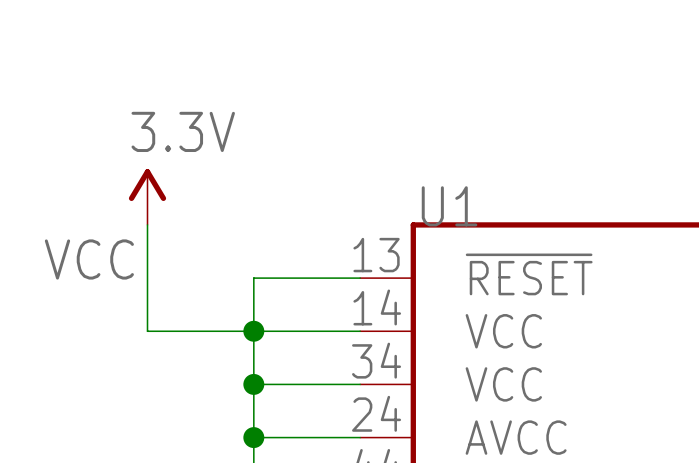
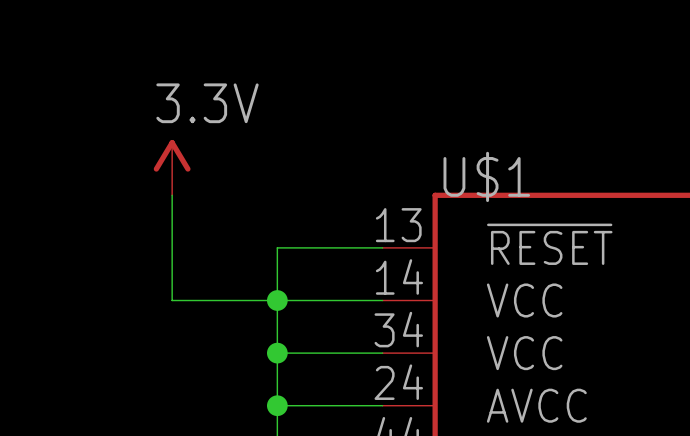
U1 name: U1 (449, 206) -> U$1 (486, 176)
label: VCC (89, 259) -> none

